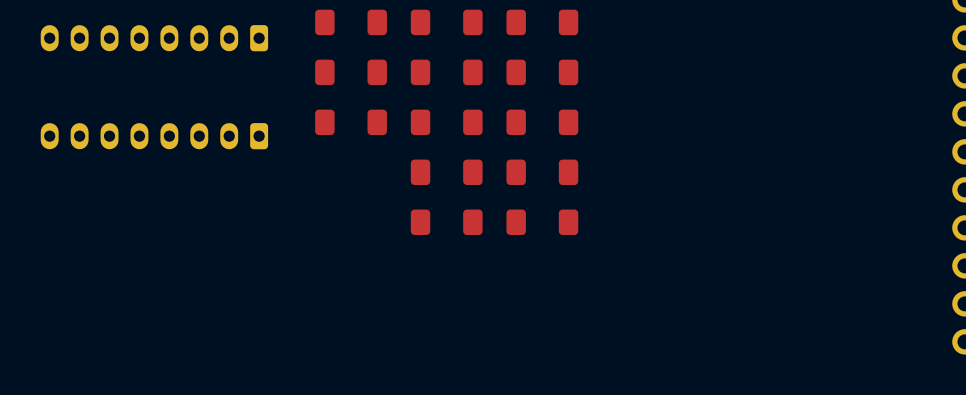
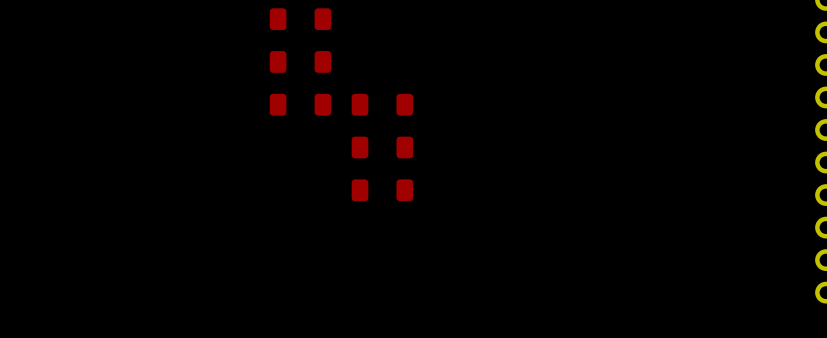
part: (446, 22) -> none
part: (542, 22) -> none
part: (154, 38) -> none
part: (446, 72) -> none
part: (542, 72) -> none
part: (542, 122) -> none
part: (154, 136) -> none
part: (542, 172) -> none
part: (542, 222) -> none

